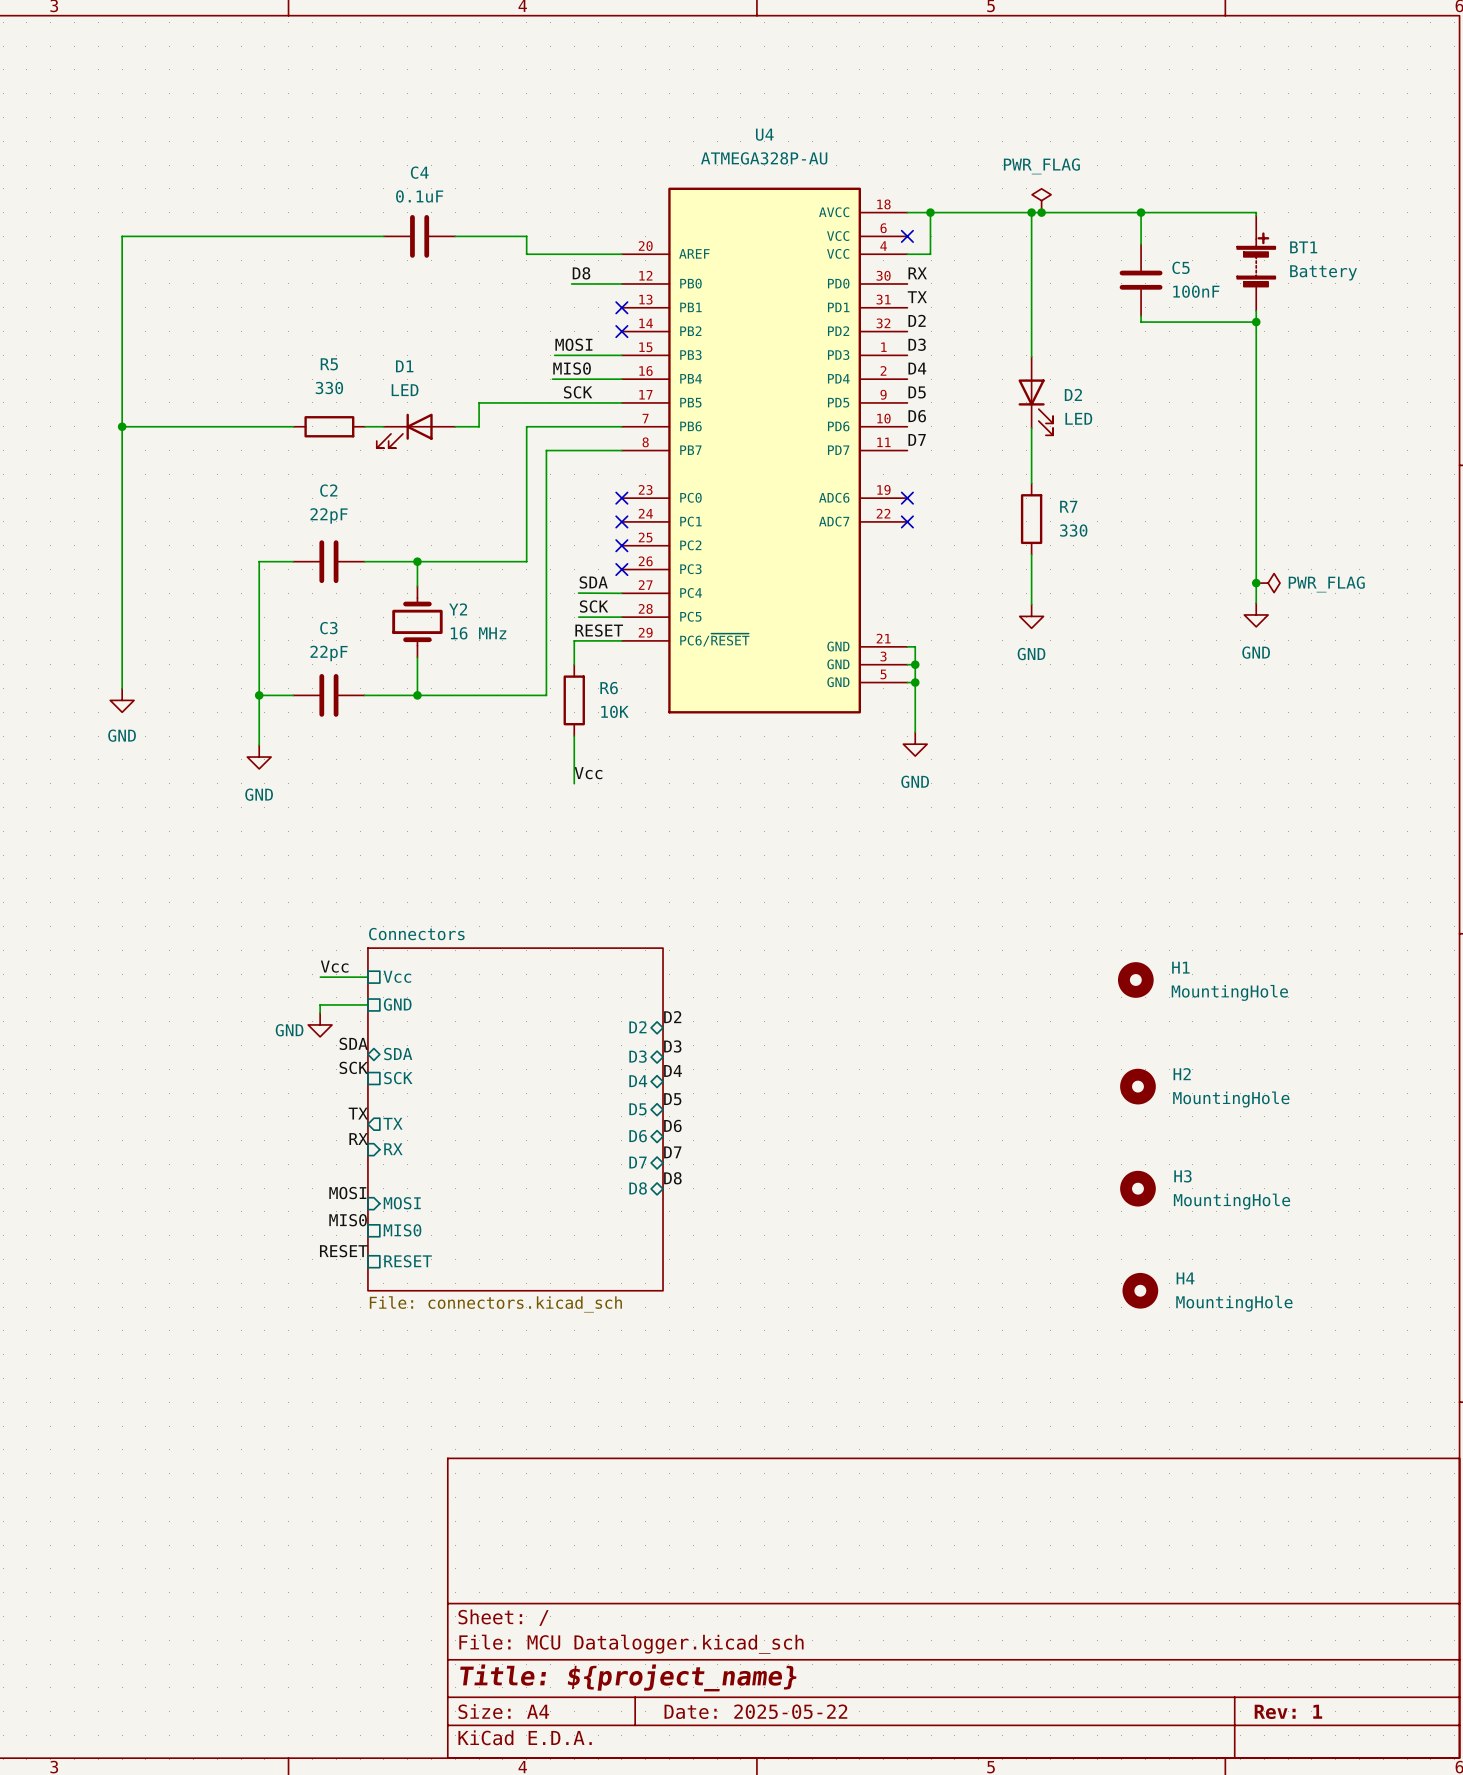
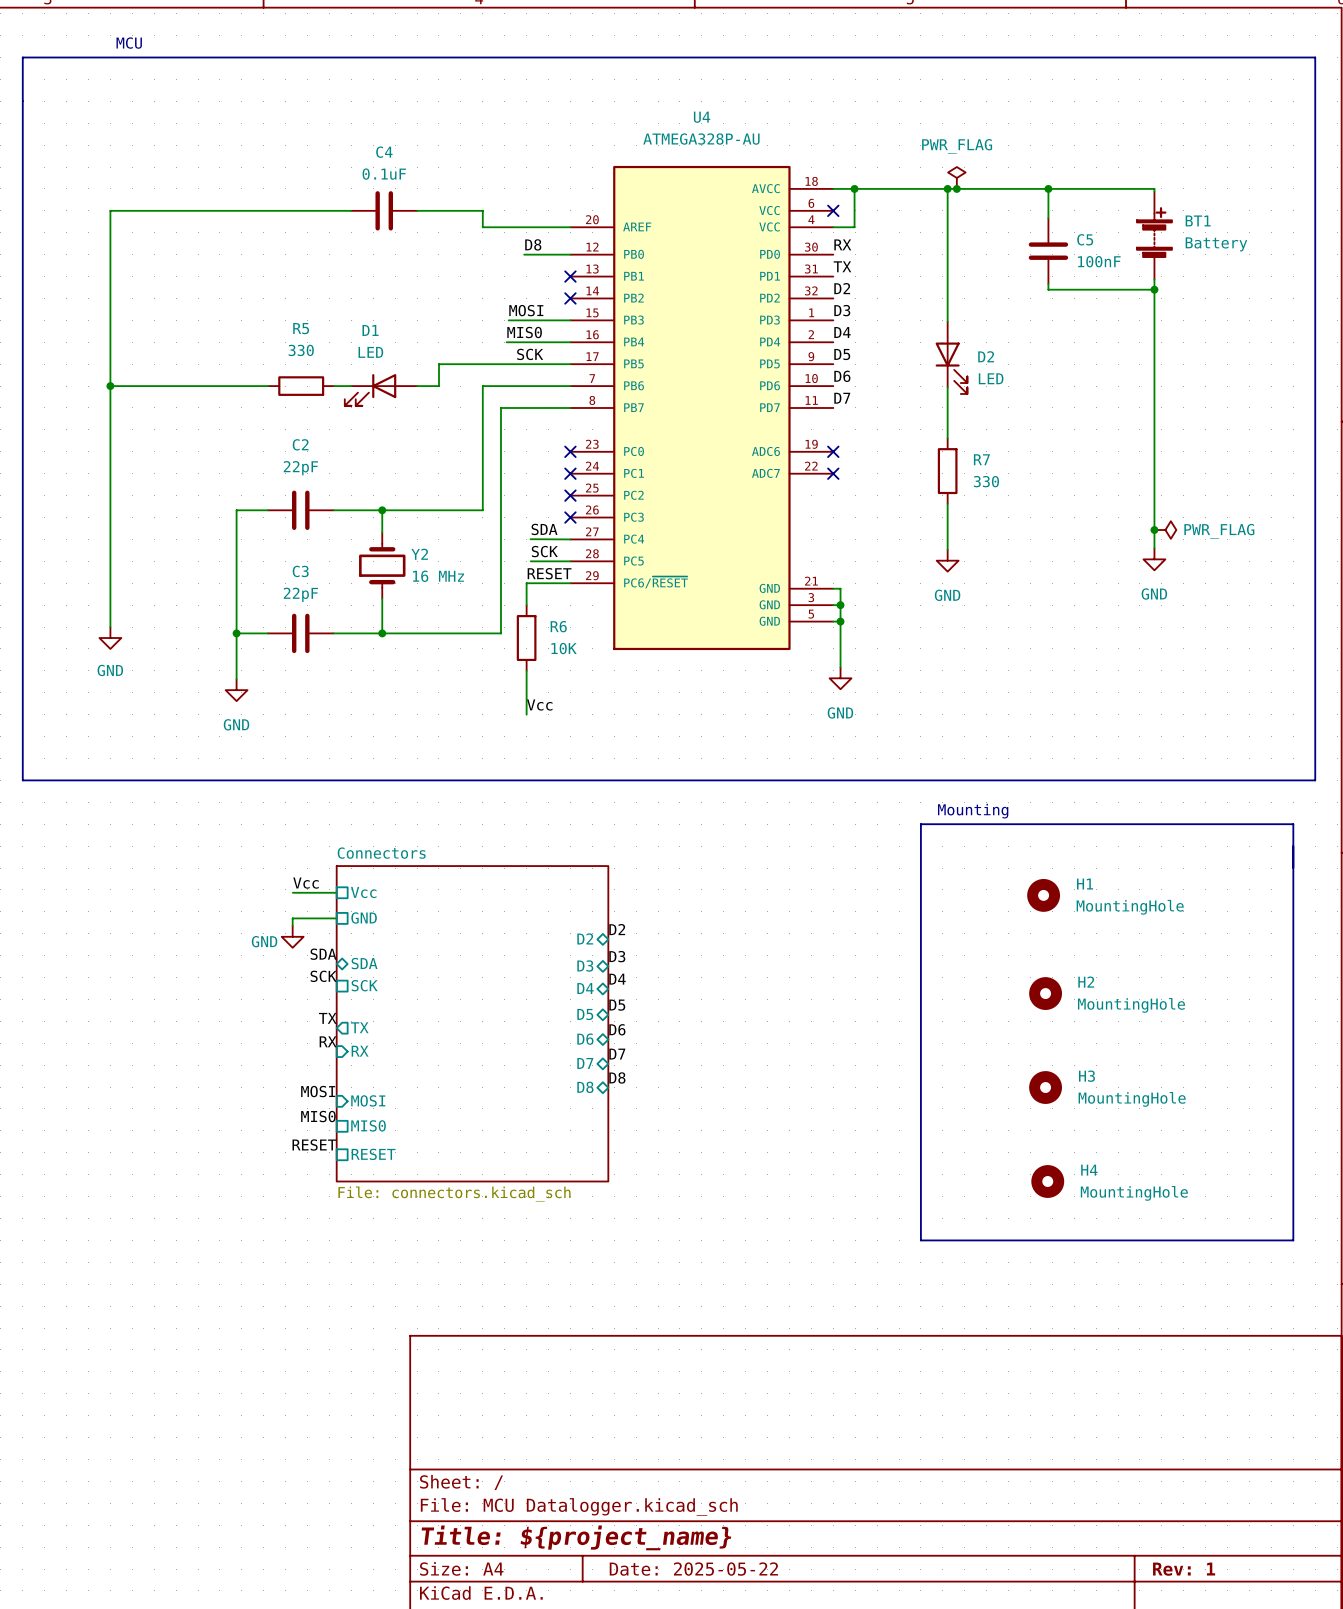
text: none -> MCU (129, 43)
line: none -> (22, 57) (1315, 57) (1315, 780) (22, 780) (22, 57)
text: none -> Mounting (973, 811)
line: none -> (920, 824) (1293, 824) (1293, 1240) (920, 1240) (920, 824)

